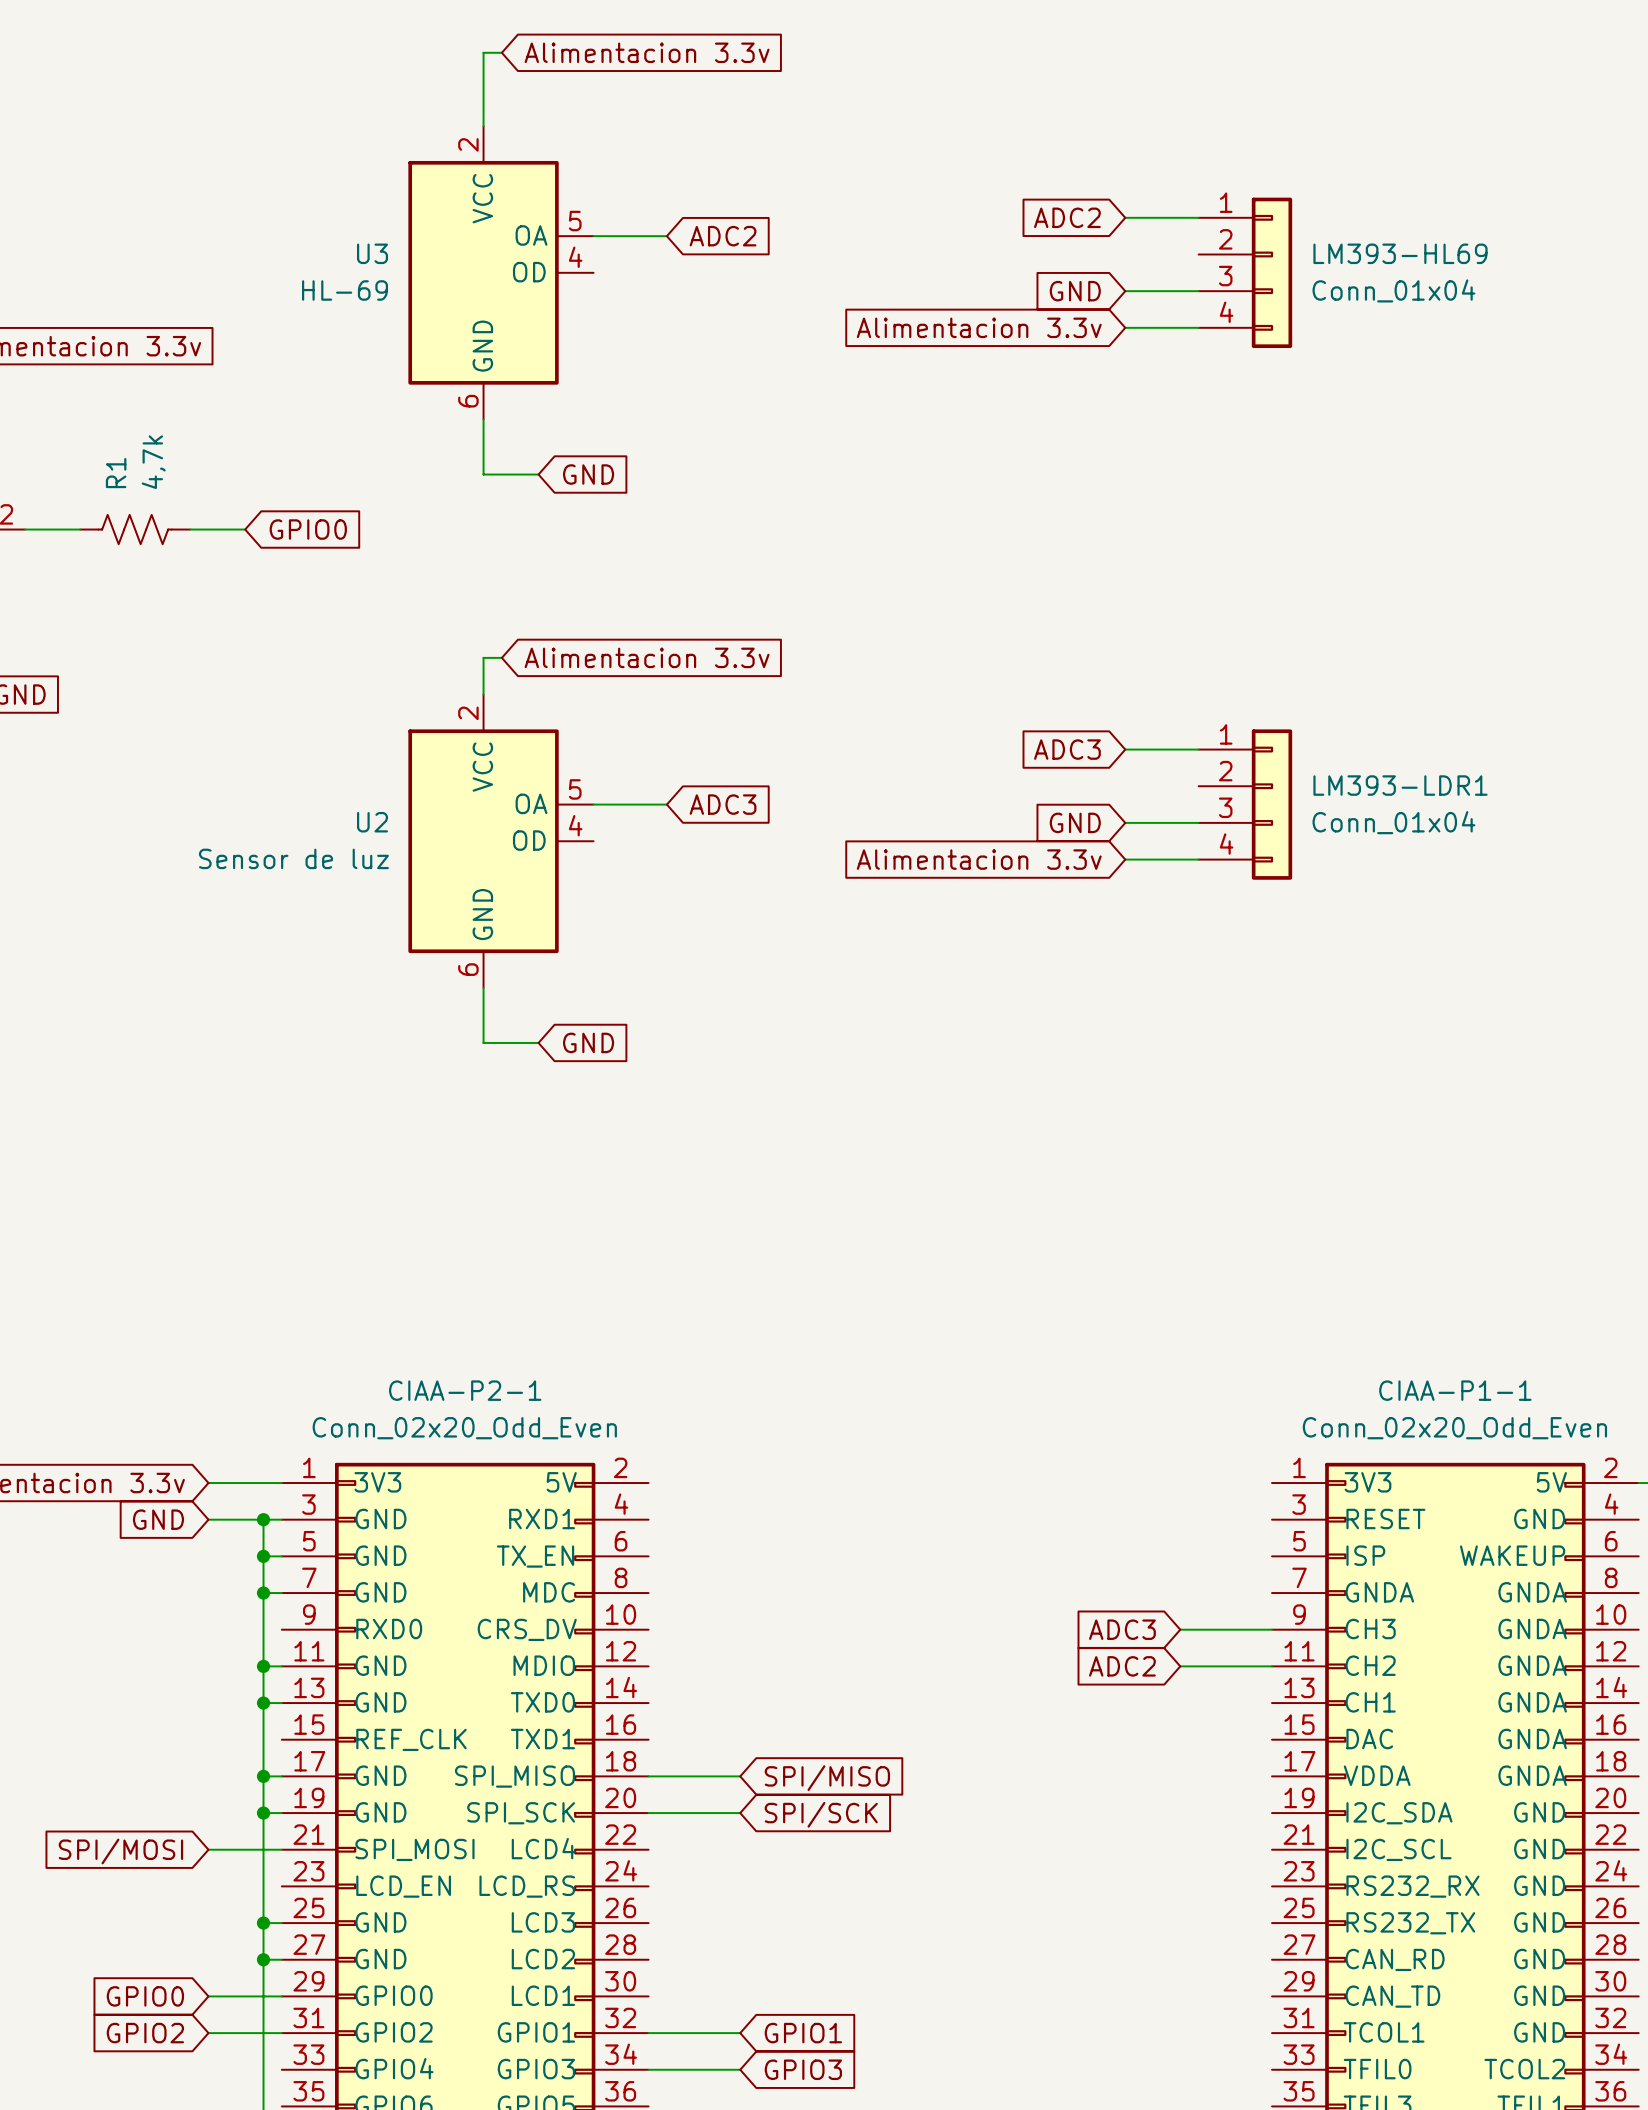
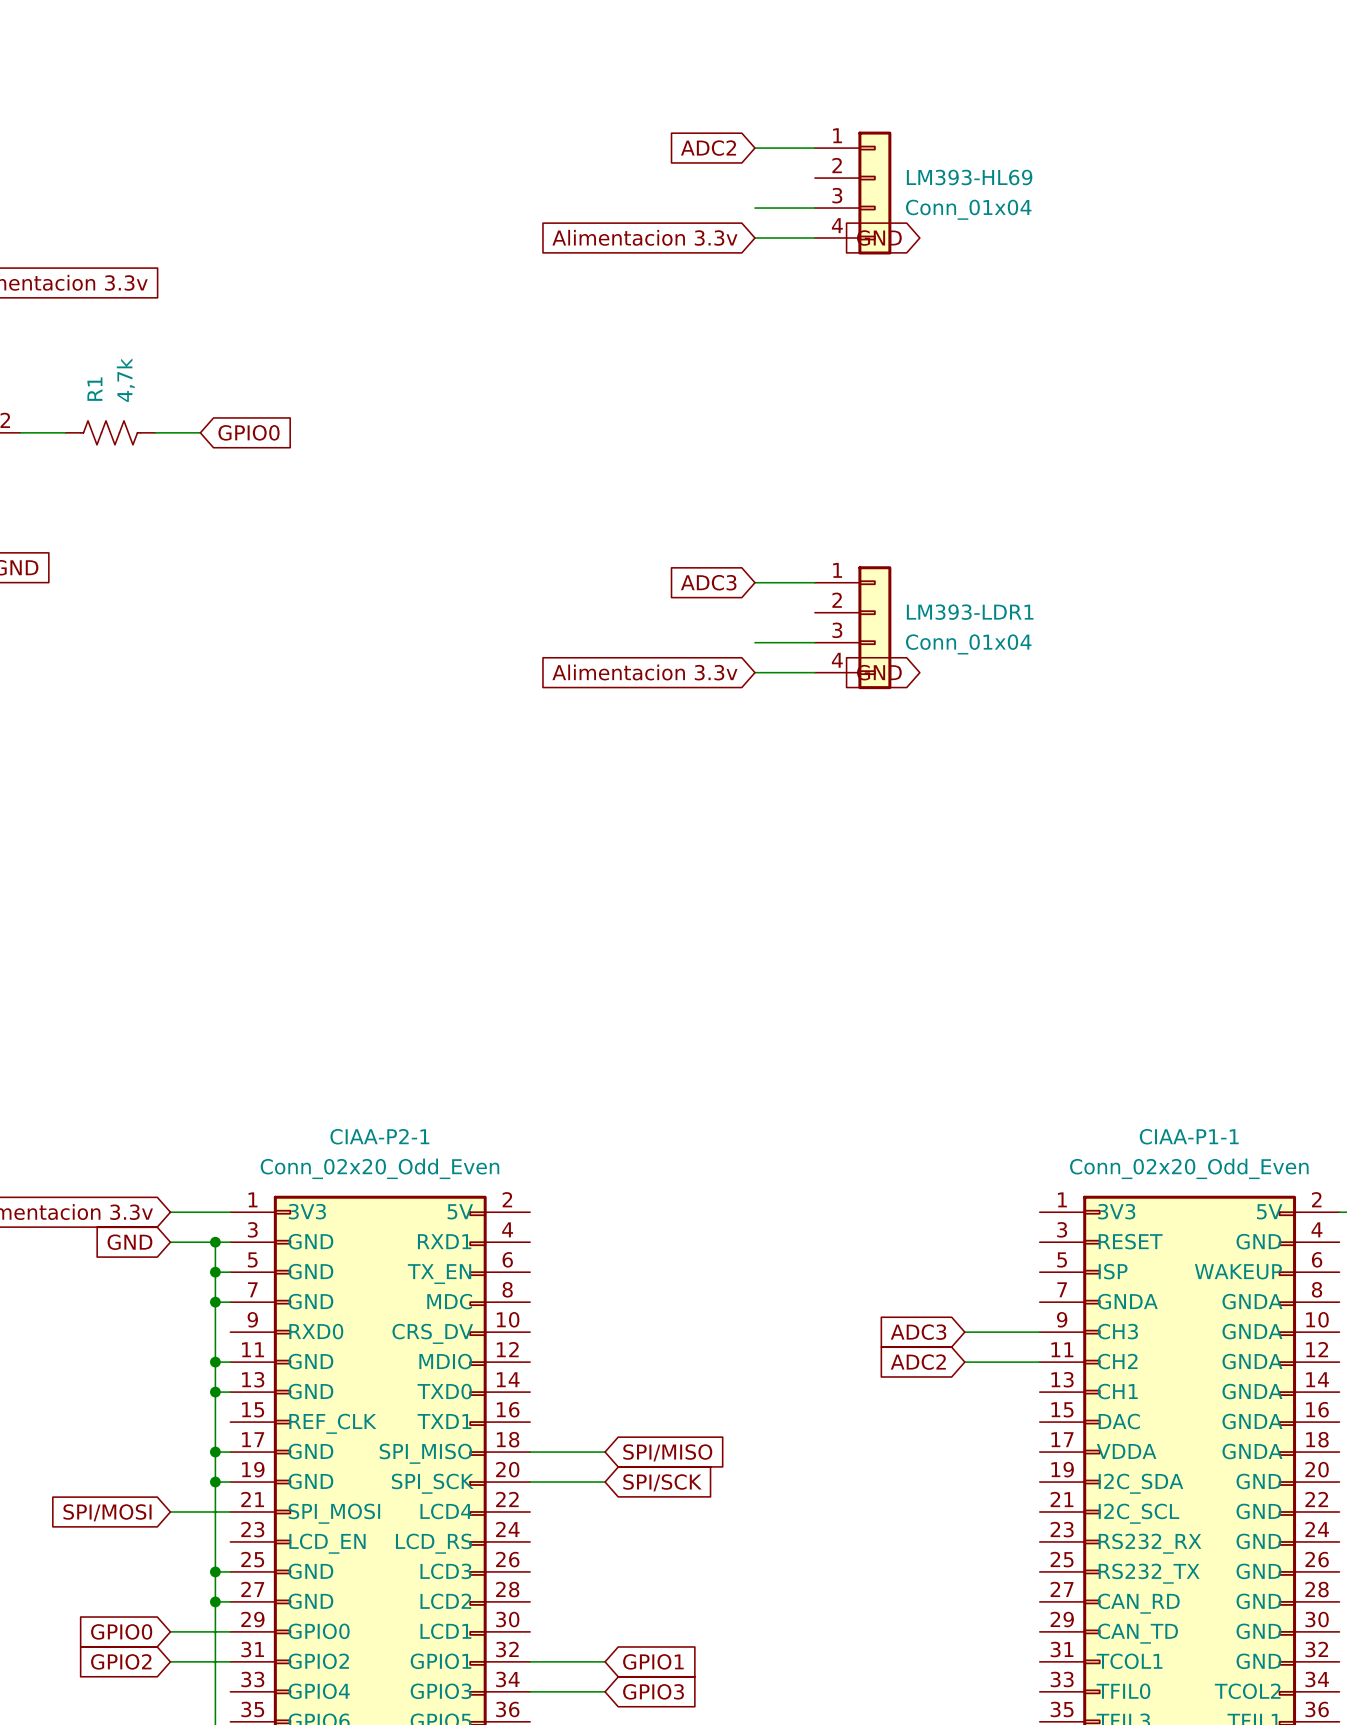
wire: (501, 52) (483, 52) (483, 126) -> none
global label: Alimentacion 3.3v (647, 52) -> none
global label: none -> ADC2 (708, 148)
global label: ADC2 (1067, 217) -> none
wire: (1125, 217) (1198, 217) -> (754, 148) (814, 148)
wire: (593, 236) (666, 236) -> none
global label: ADC2 (723, 236) -> none
U3: HL-69 (500, 272) -> none
LM393-HL69 position: (1245, 272) -> (853, 193)
wire: (1125, 291) (1198, 291) -> (754, 208) (814, 208)
global label position: Alimentacion 3.3v (979, 327) -> Alimentacion 3.3v (644, 237)
wire: (1125, 327) (1198, 327) -> (754, 238) (814, 238)
wire: (483, 419) (483, 474) (538, 474) -> none
global label: GND (588, 474) -> none
wire: (501, 657) (483, 657) (483, 694) -> none
global label: Alimentacion 3.3v (647, 657) -> none
global label: none -> ADC3 (708, 582)
global label: ADC3 (1067, 749) -> none
wire: (1125, 749) (1198, 749) -> (754, 582) (814, 582)
wire: (593, 804) (666, 804) -> none
global label: ADC3 (723, 804) -> none
LM393-LDR1 position: (1245, 804) -> (853, 627)
wire: (1125, 822) (1198, 822) -> (754, 642) (814, 642)
U2: Sensor de luz (500, 841) -> none
global label position: Alimentacion 3.3v (979, 859) -> Alimentacion 3.3v (644, 672)
wire: (1125, 859) (1198, 859) -> (754, 672) (814, 672)
wire: (483, 987) (483, 1042) (538, 1042) -> none
global label: GND (588, 1042) -> none

